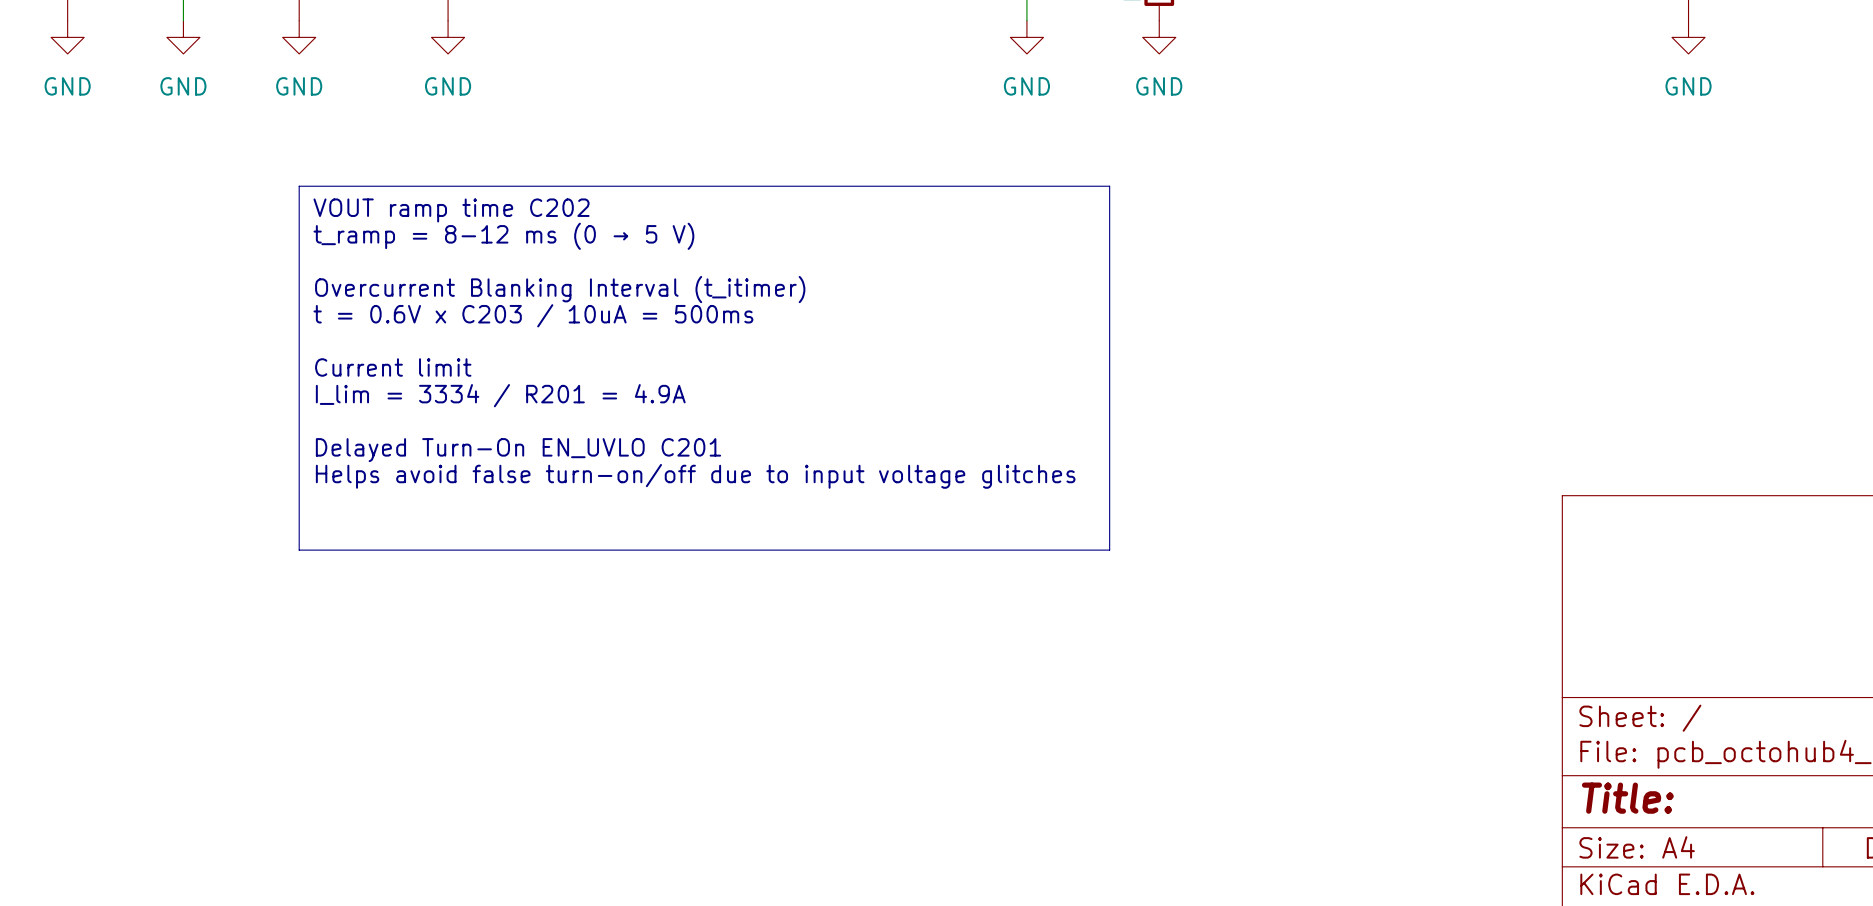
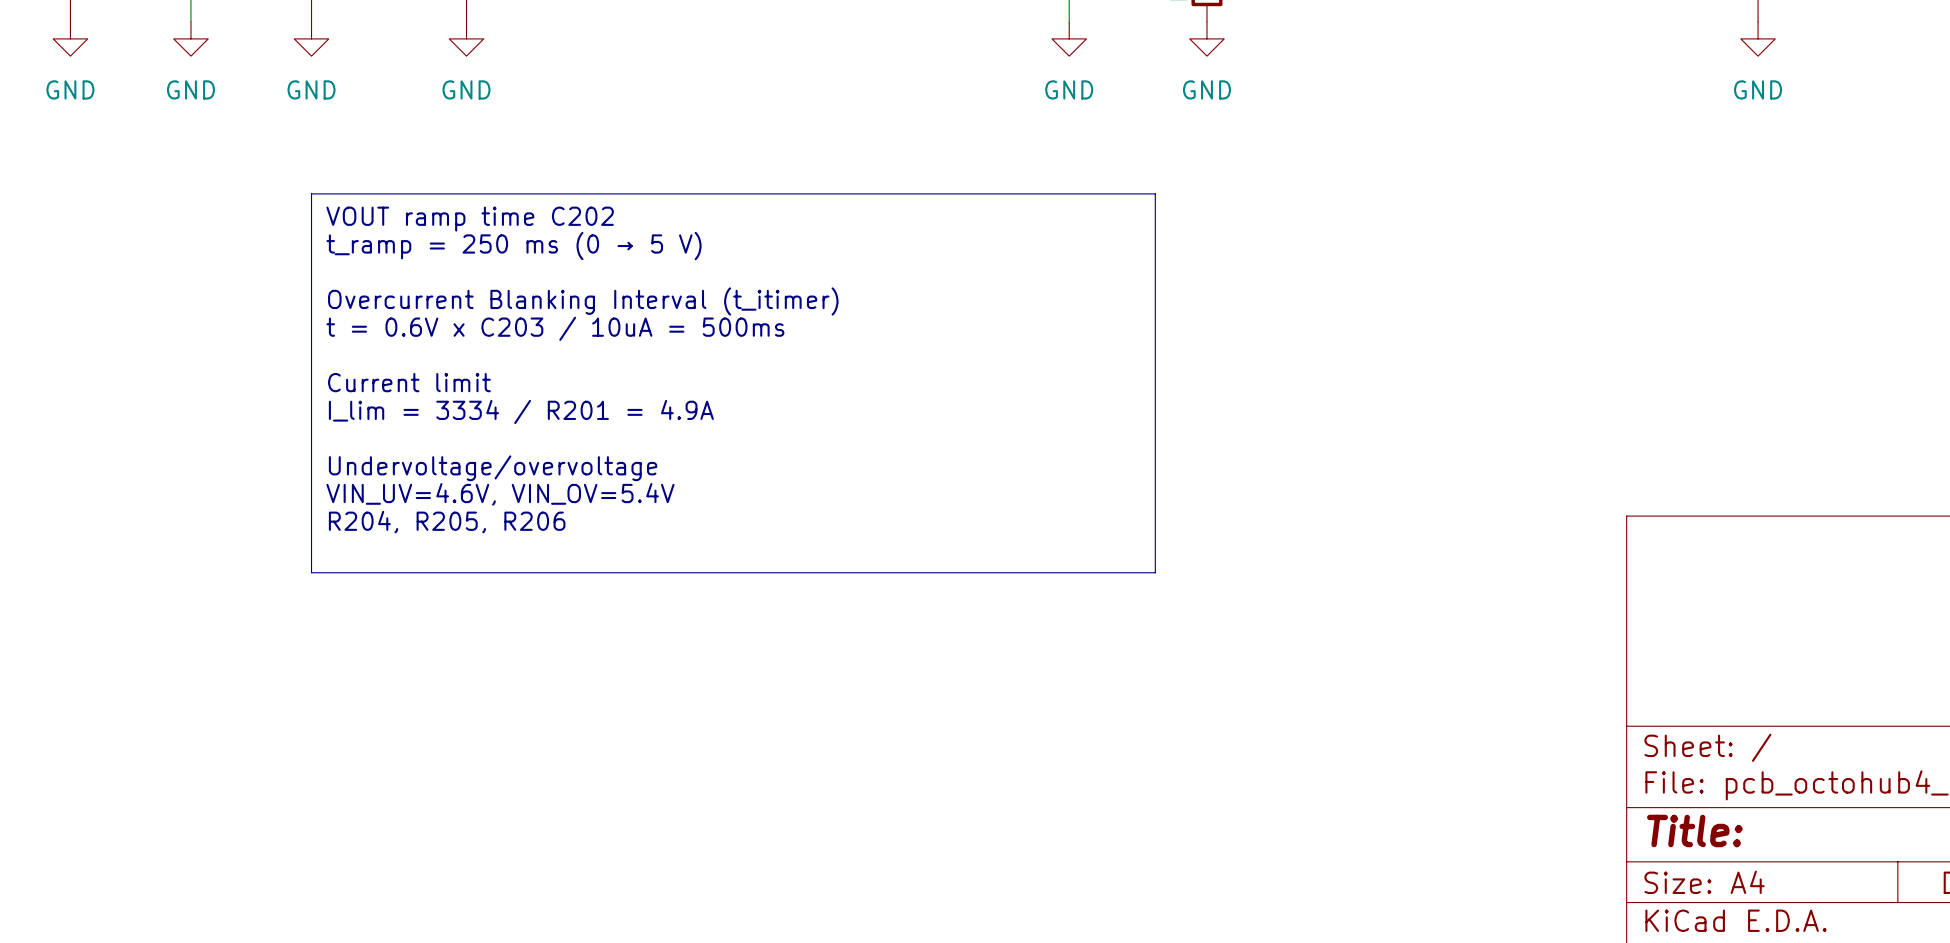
text: t_ramp = 8-12 ms (0 → 5 V) (503, 236) -> t_ramp = 250 ms (0 → 5 V) (513, 246)
text: Delayed Turn-On EN_UVLO C201 (518, 450) -> Undervoltage/overvoltage (493, 468)
text: Helps avoid false turn-on/off due to input voltage glitches (695, 476) -> VIN_UV=4.6V, VIN_OV=5.4V (500, 494)
text: none -> R204, R205, R206 (447, 522)

